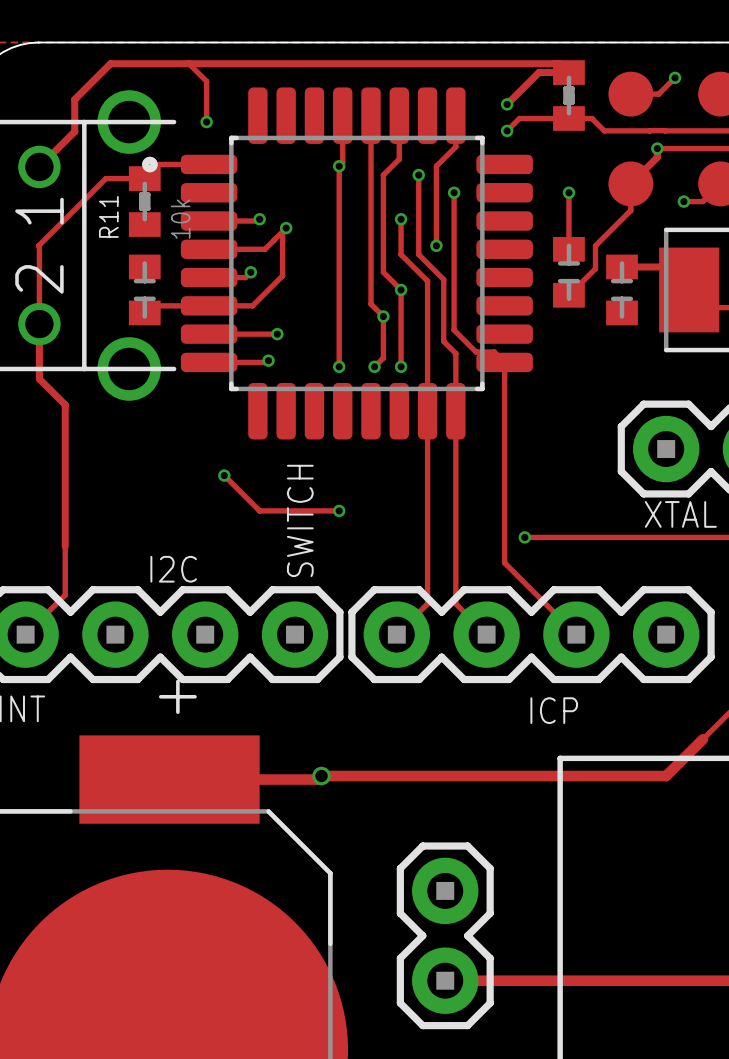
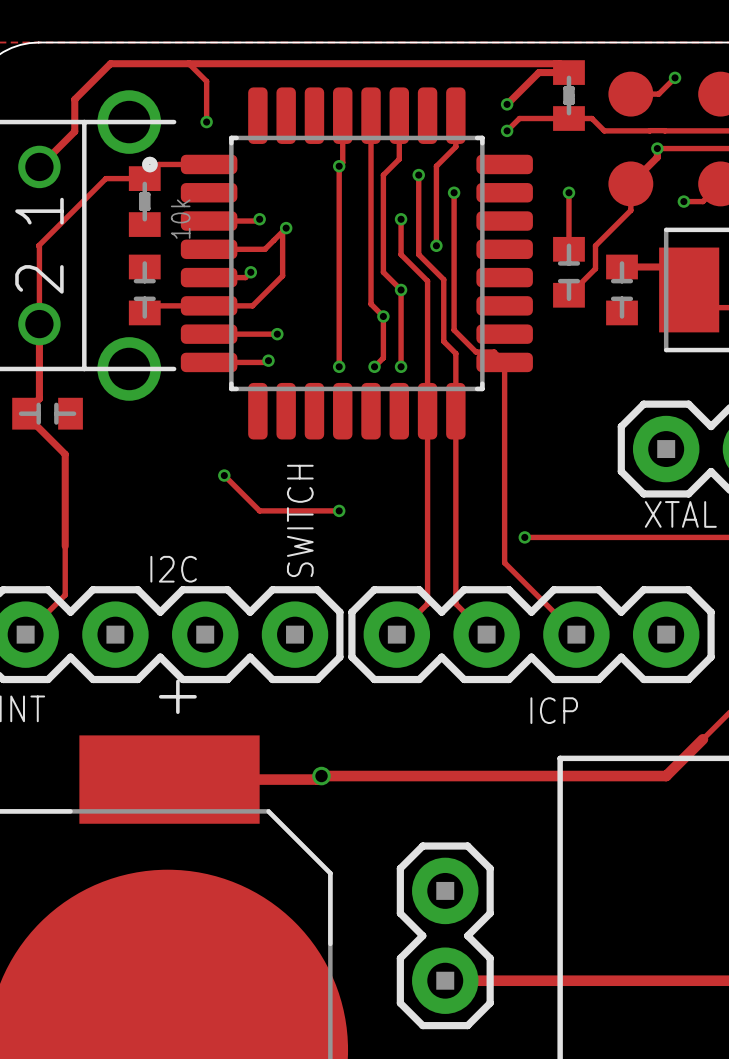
R11 name: R11 (108, 216) -> none
track: (39, 379) (65, 404) (65, 454) -> (39, 379) (39, 398) (24, 413) (65, 454)
part: none -> (47, 413)

